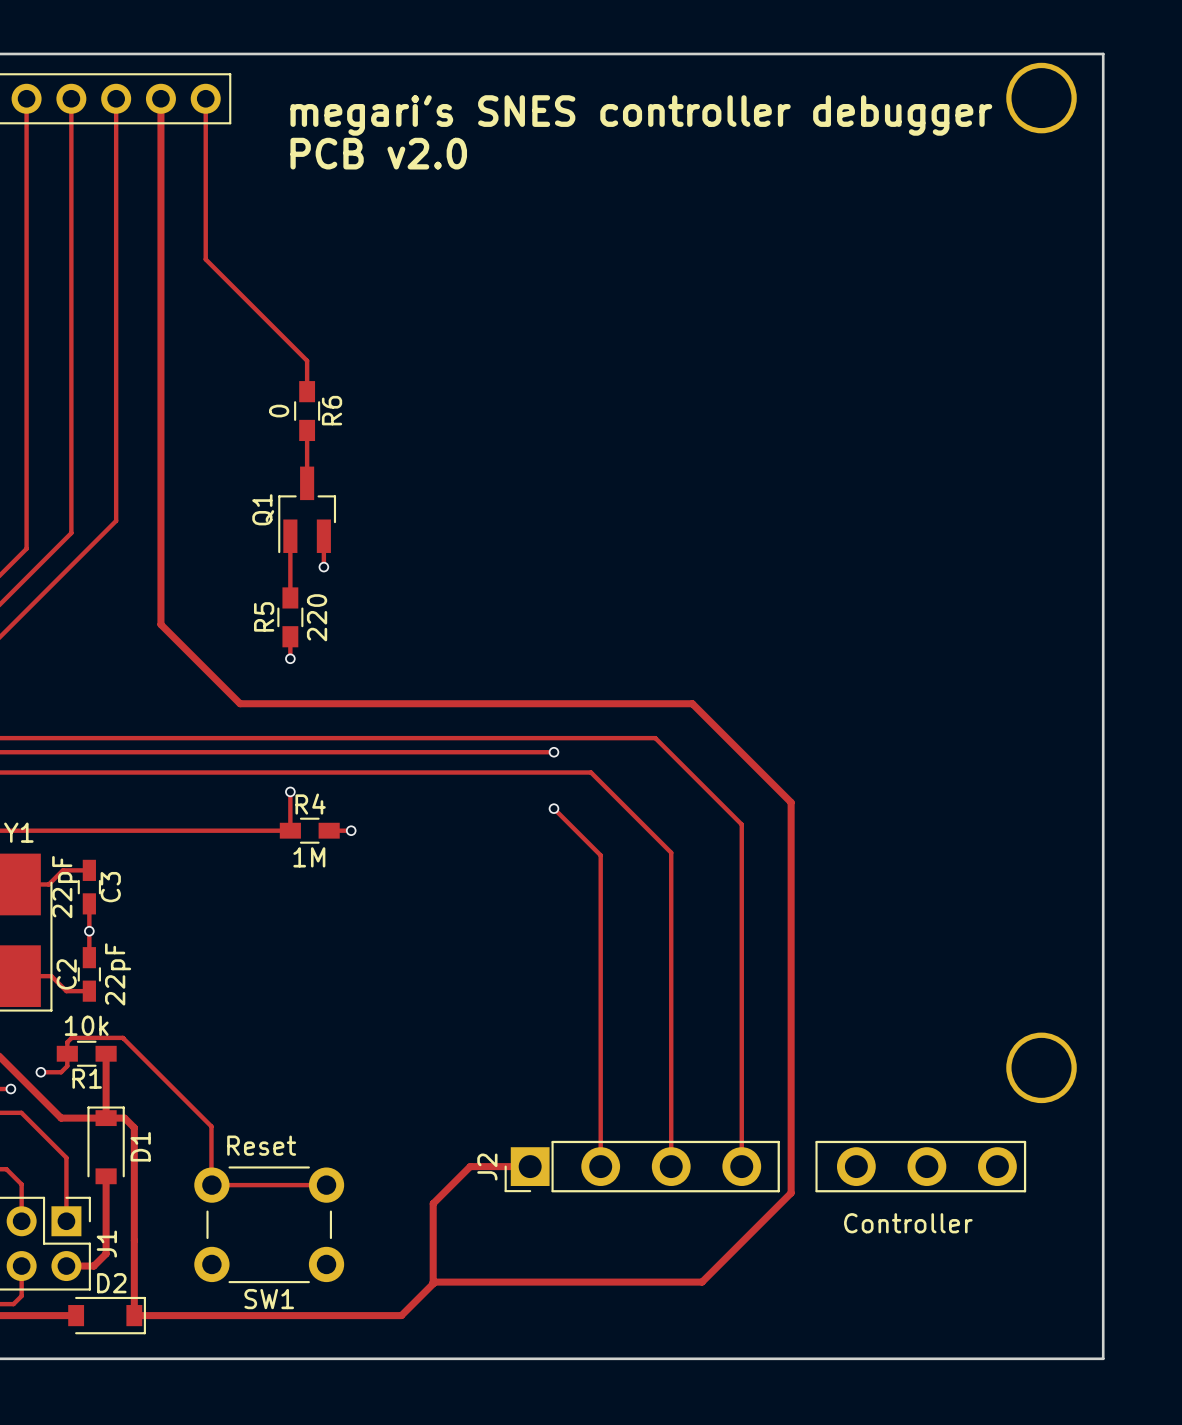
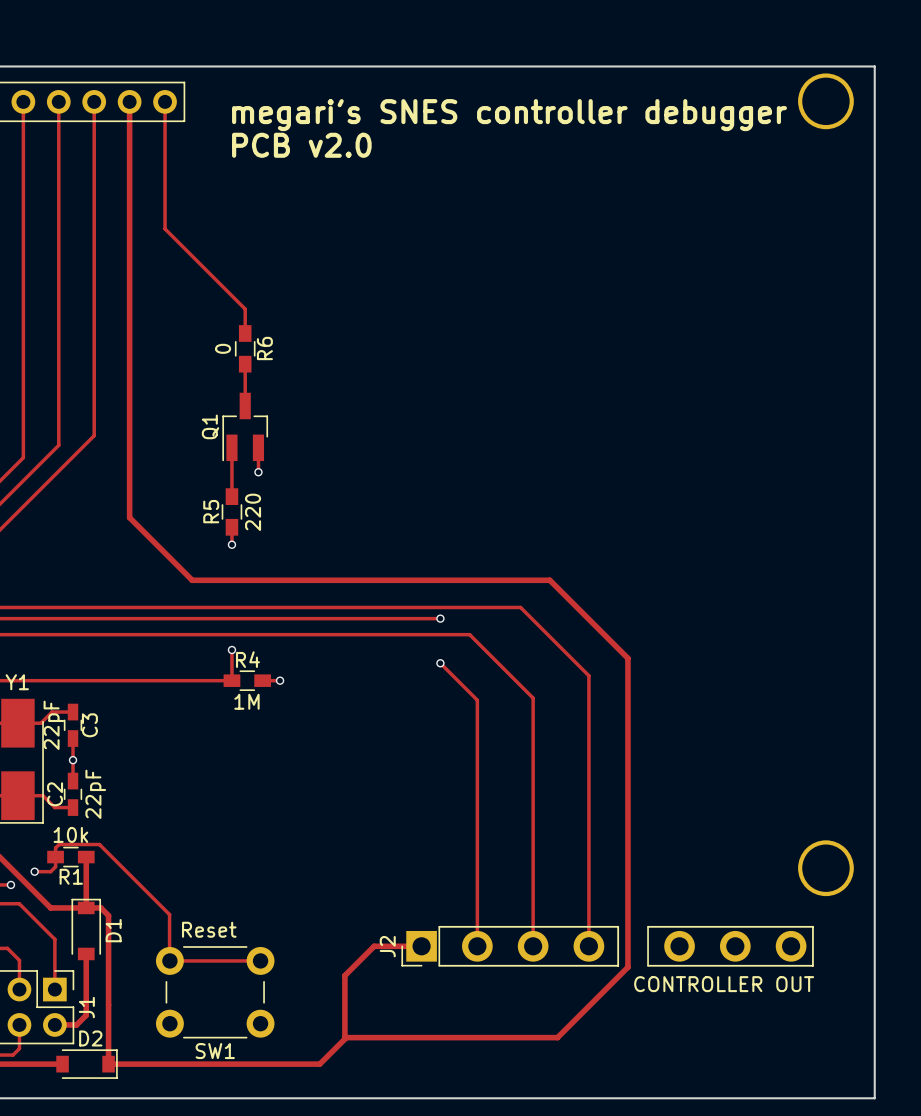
J2 value: Controller (908, 1223) -> CONTROLLER OUT (724, 984)

